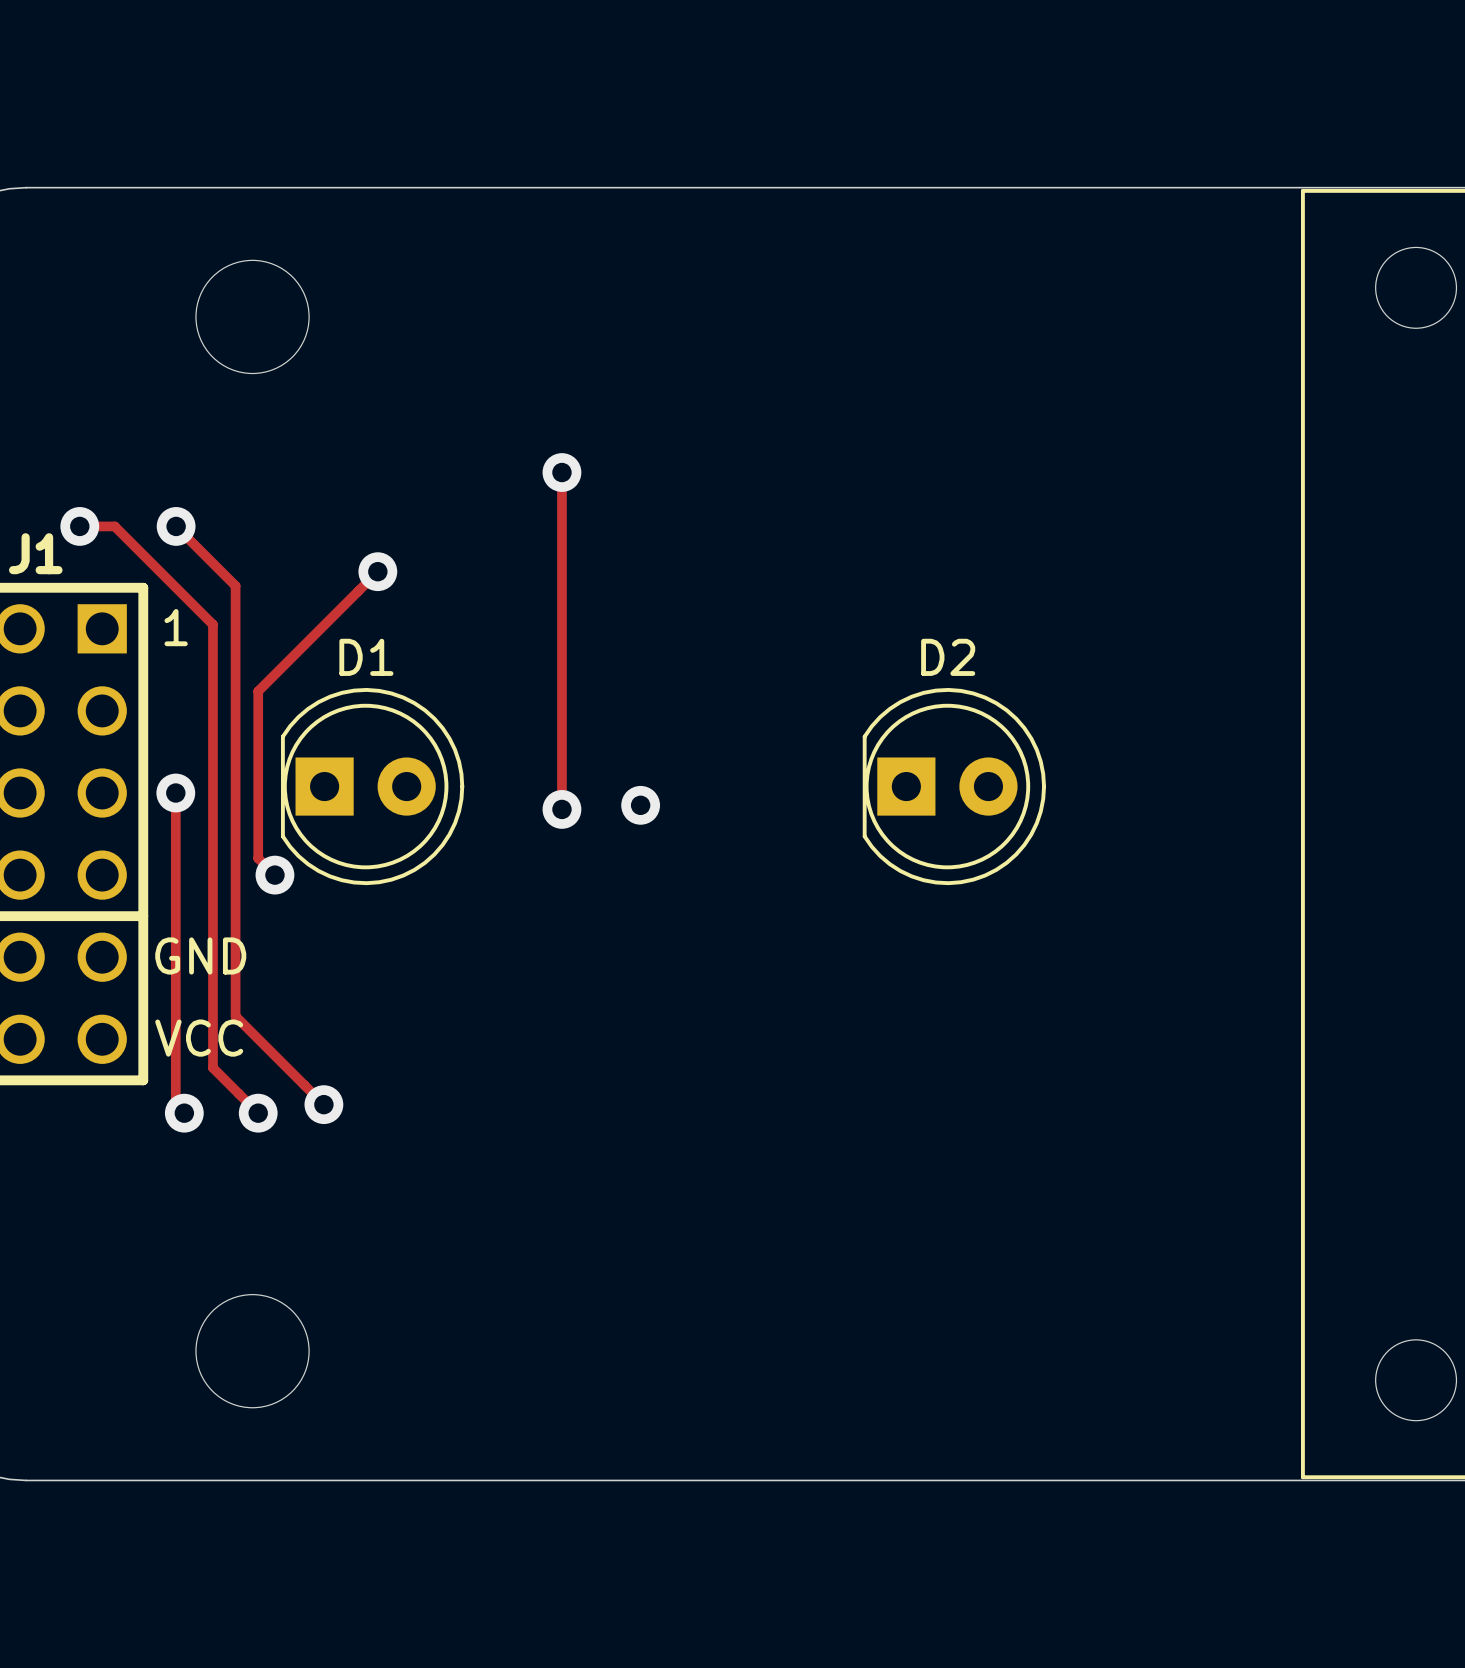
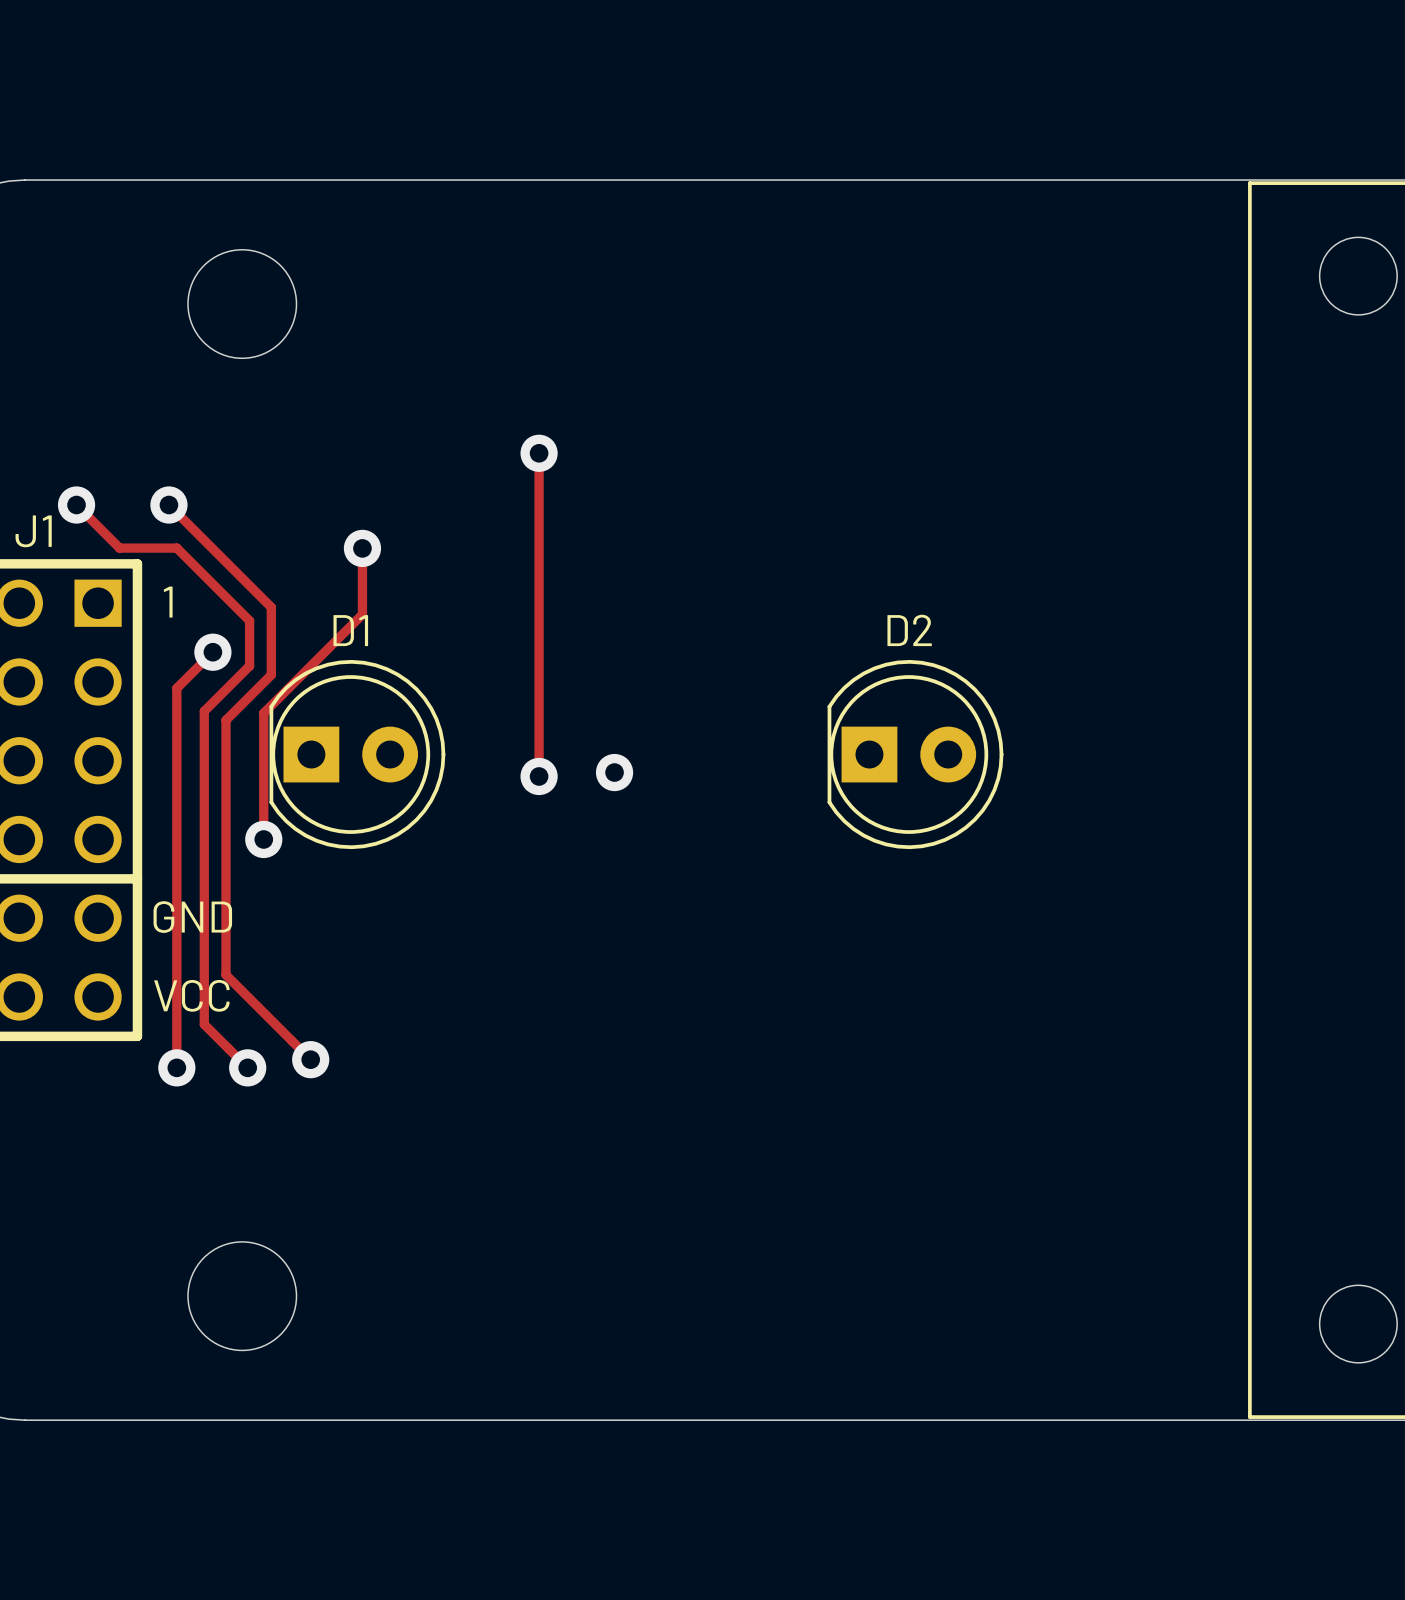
track: (79, 526) (114, 526) (212, 624) (212, 741) -> (76, 505) (119, 548) (176, 548) (249, 620) (249, 665) (204, 711)
track: (377, 571) (258, 691) (258, 858) (274, 875) -> (362, 548) (362, 614) (263, 713) (263, 839)
track: (235, 585) (235, 750) -> (226, 562) (271, 607) (271, 674) (226, 720)
track: (175, 793) (175, 1104) (184, 1113) -> (212, 652) (176, 688) (176, 1067)
via position: (175, 793) -> (212, 652)

